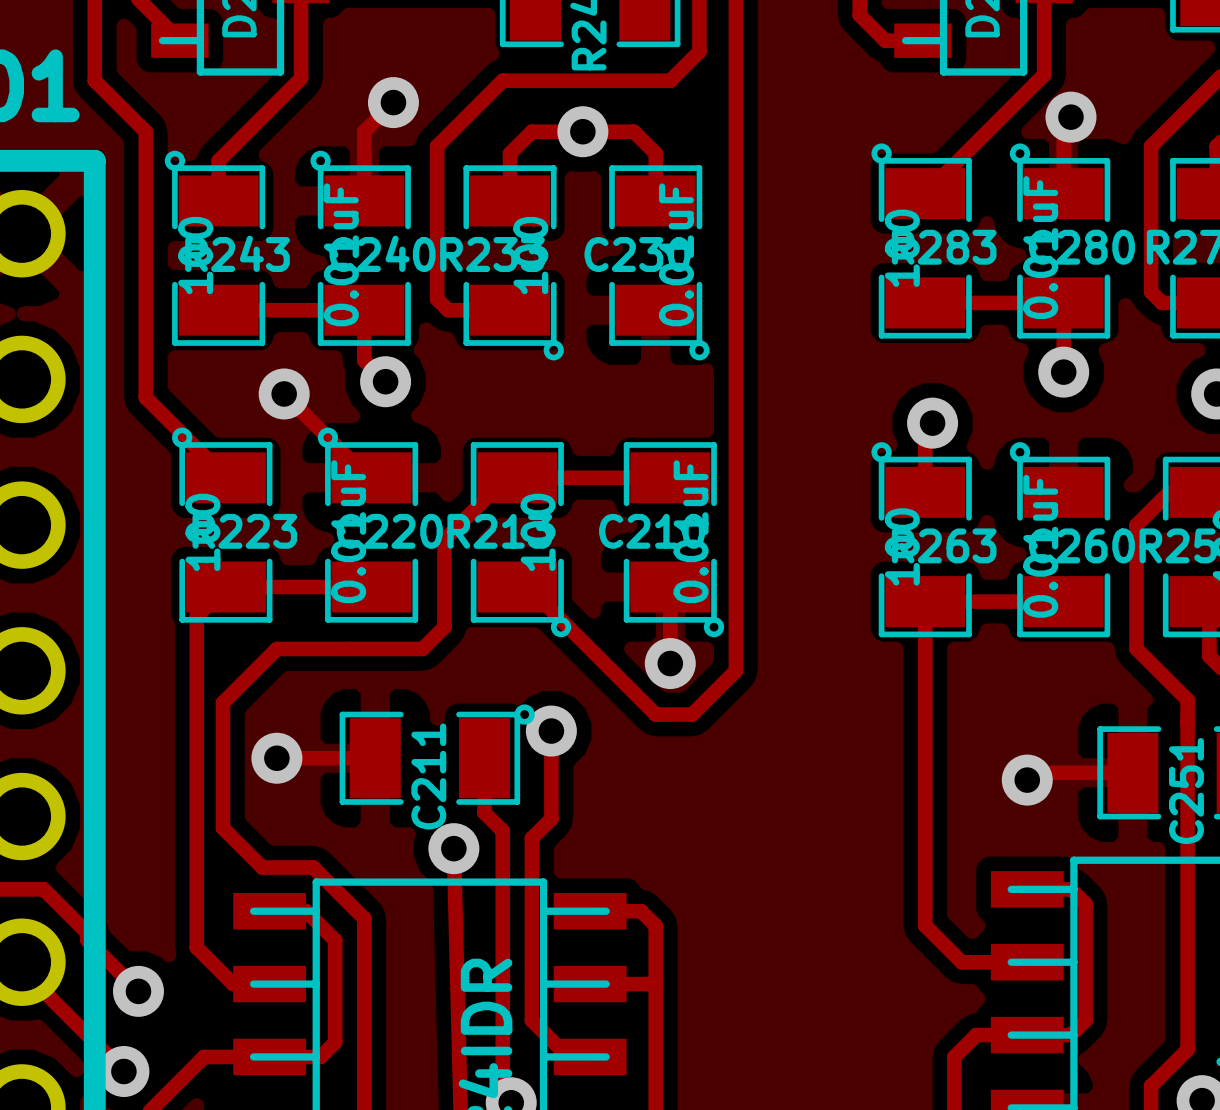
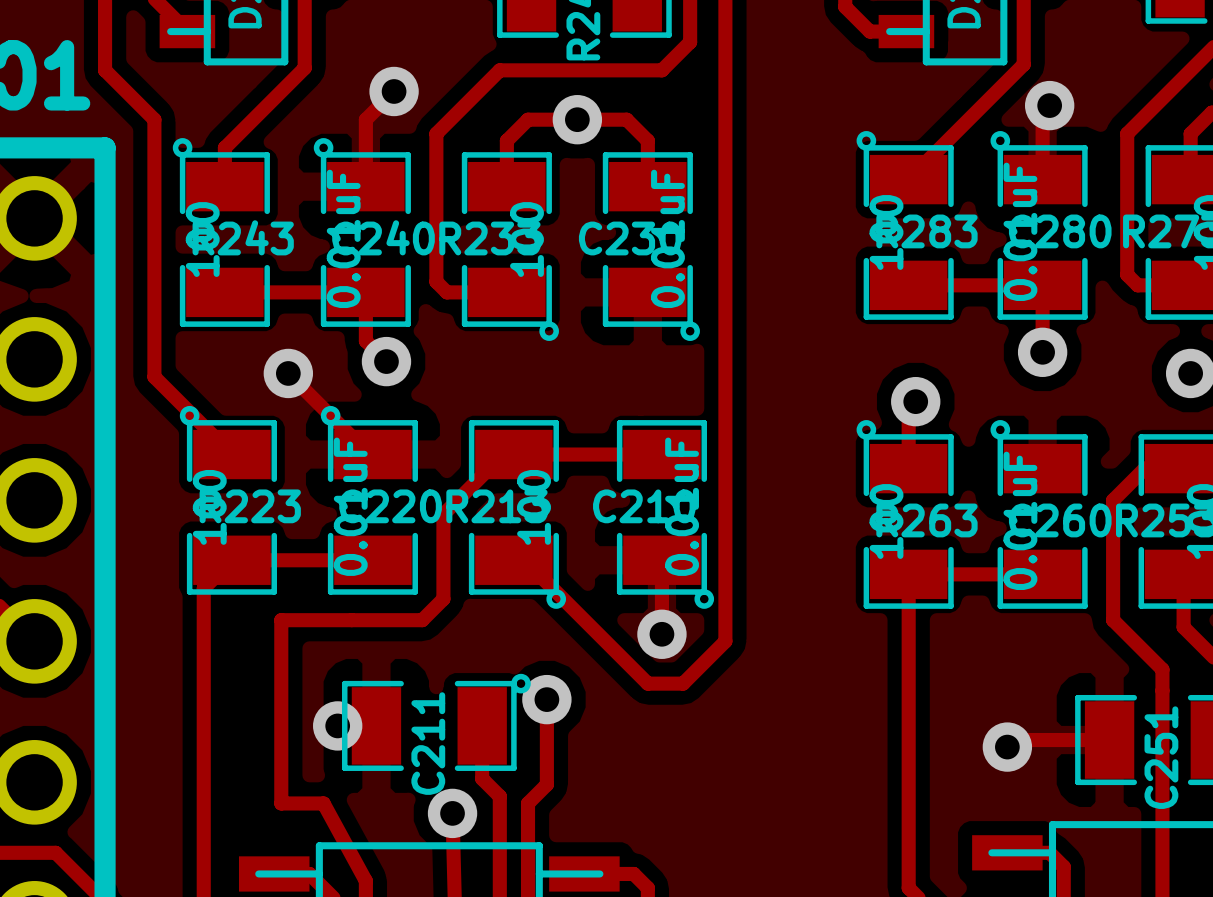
track: (276, 648) (222, 702) (222, 828) (262, 867) (313, 867) (364, 918) -> (281, 620) (281, 803) (323, 803) (365, 881)
track: (276, 758) (335, 758) -> none
via position: (276, 758) -> (337, 725)

